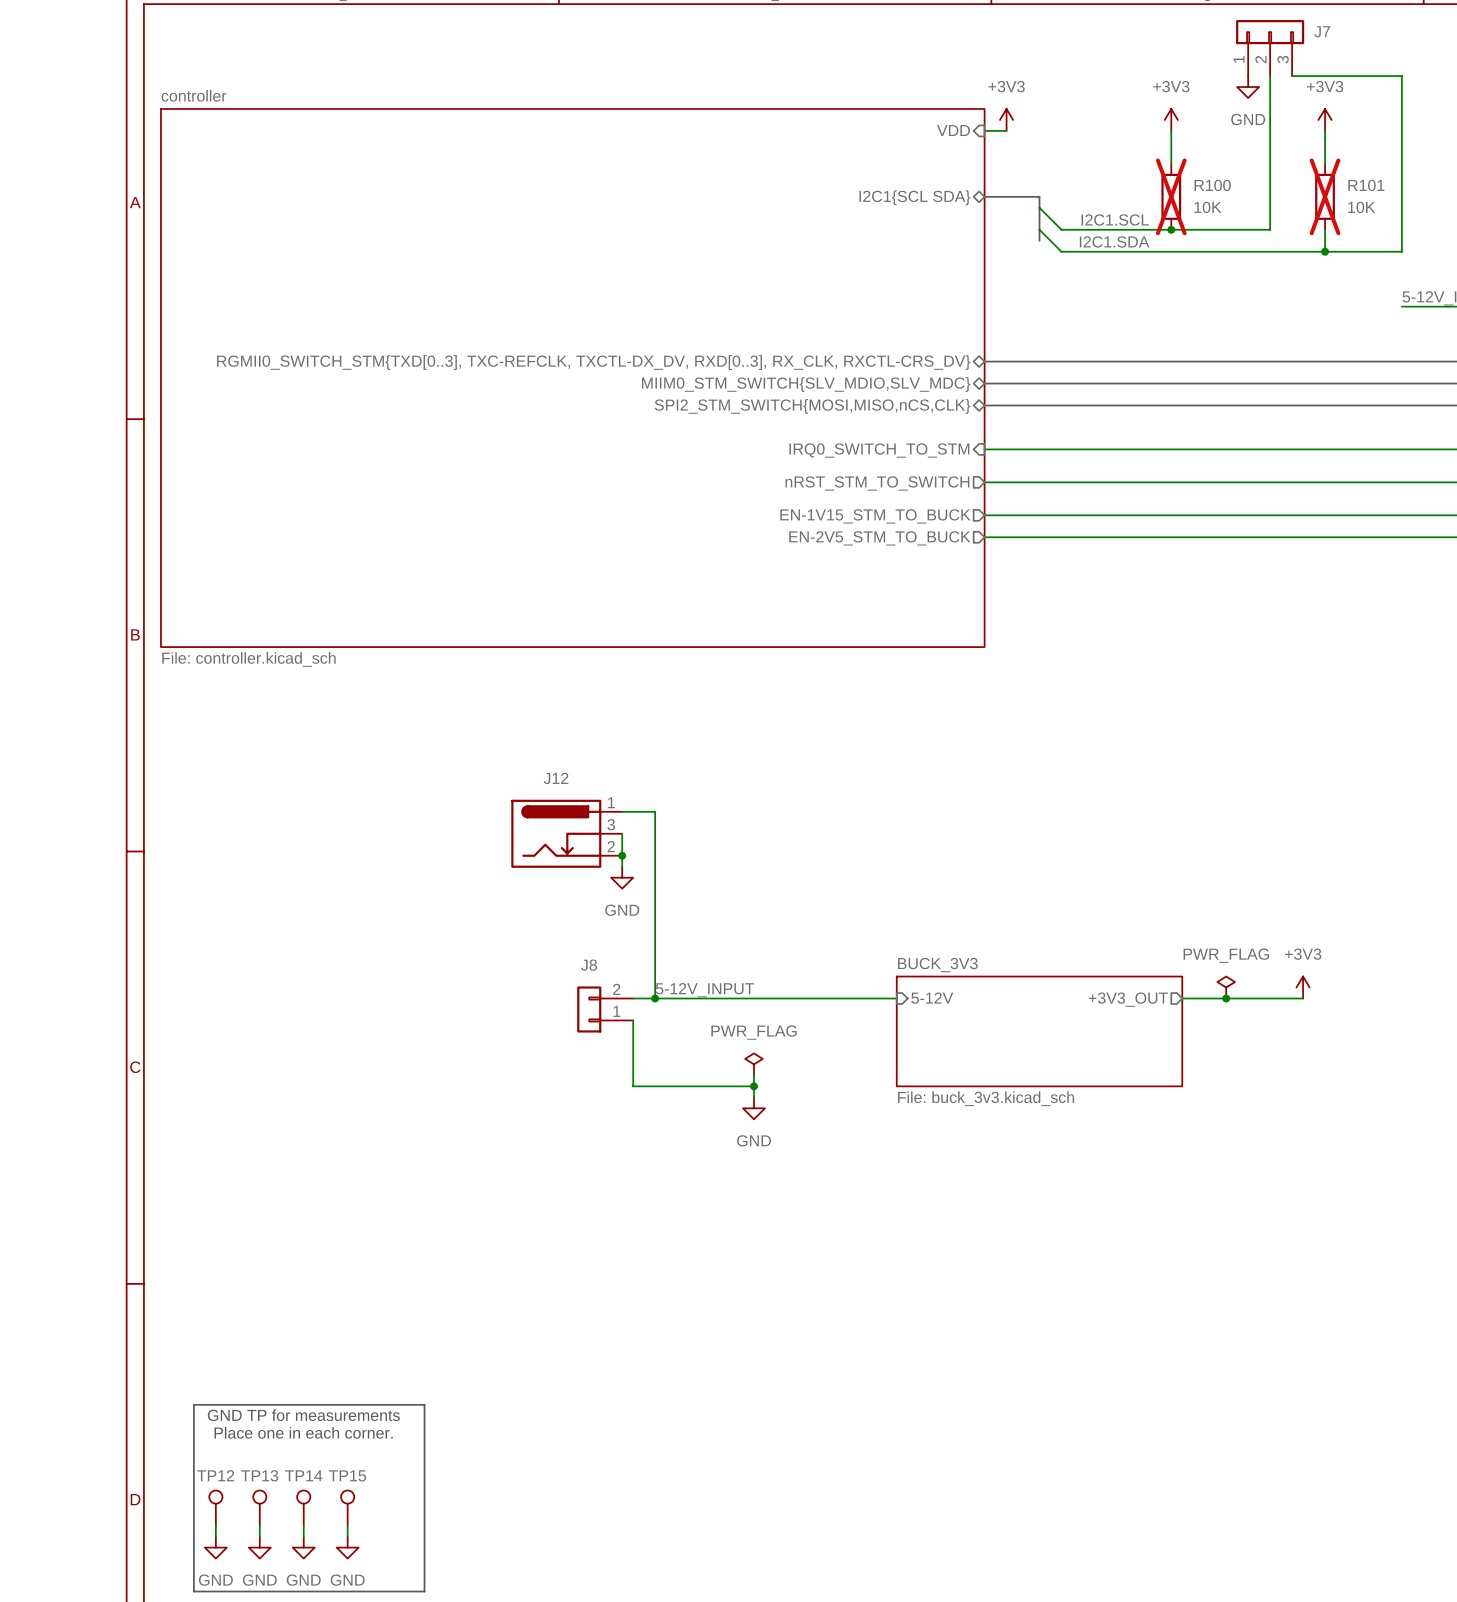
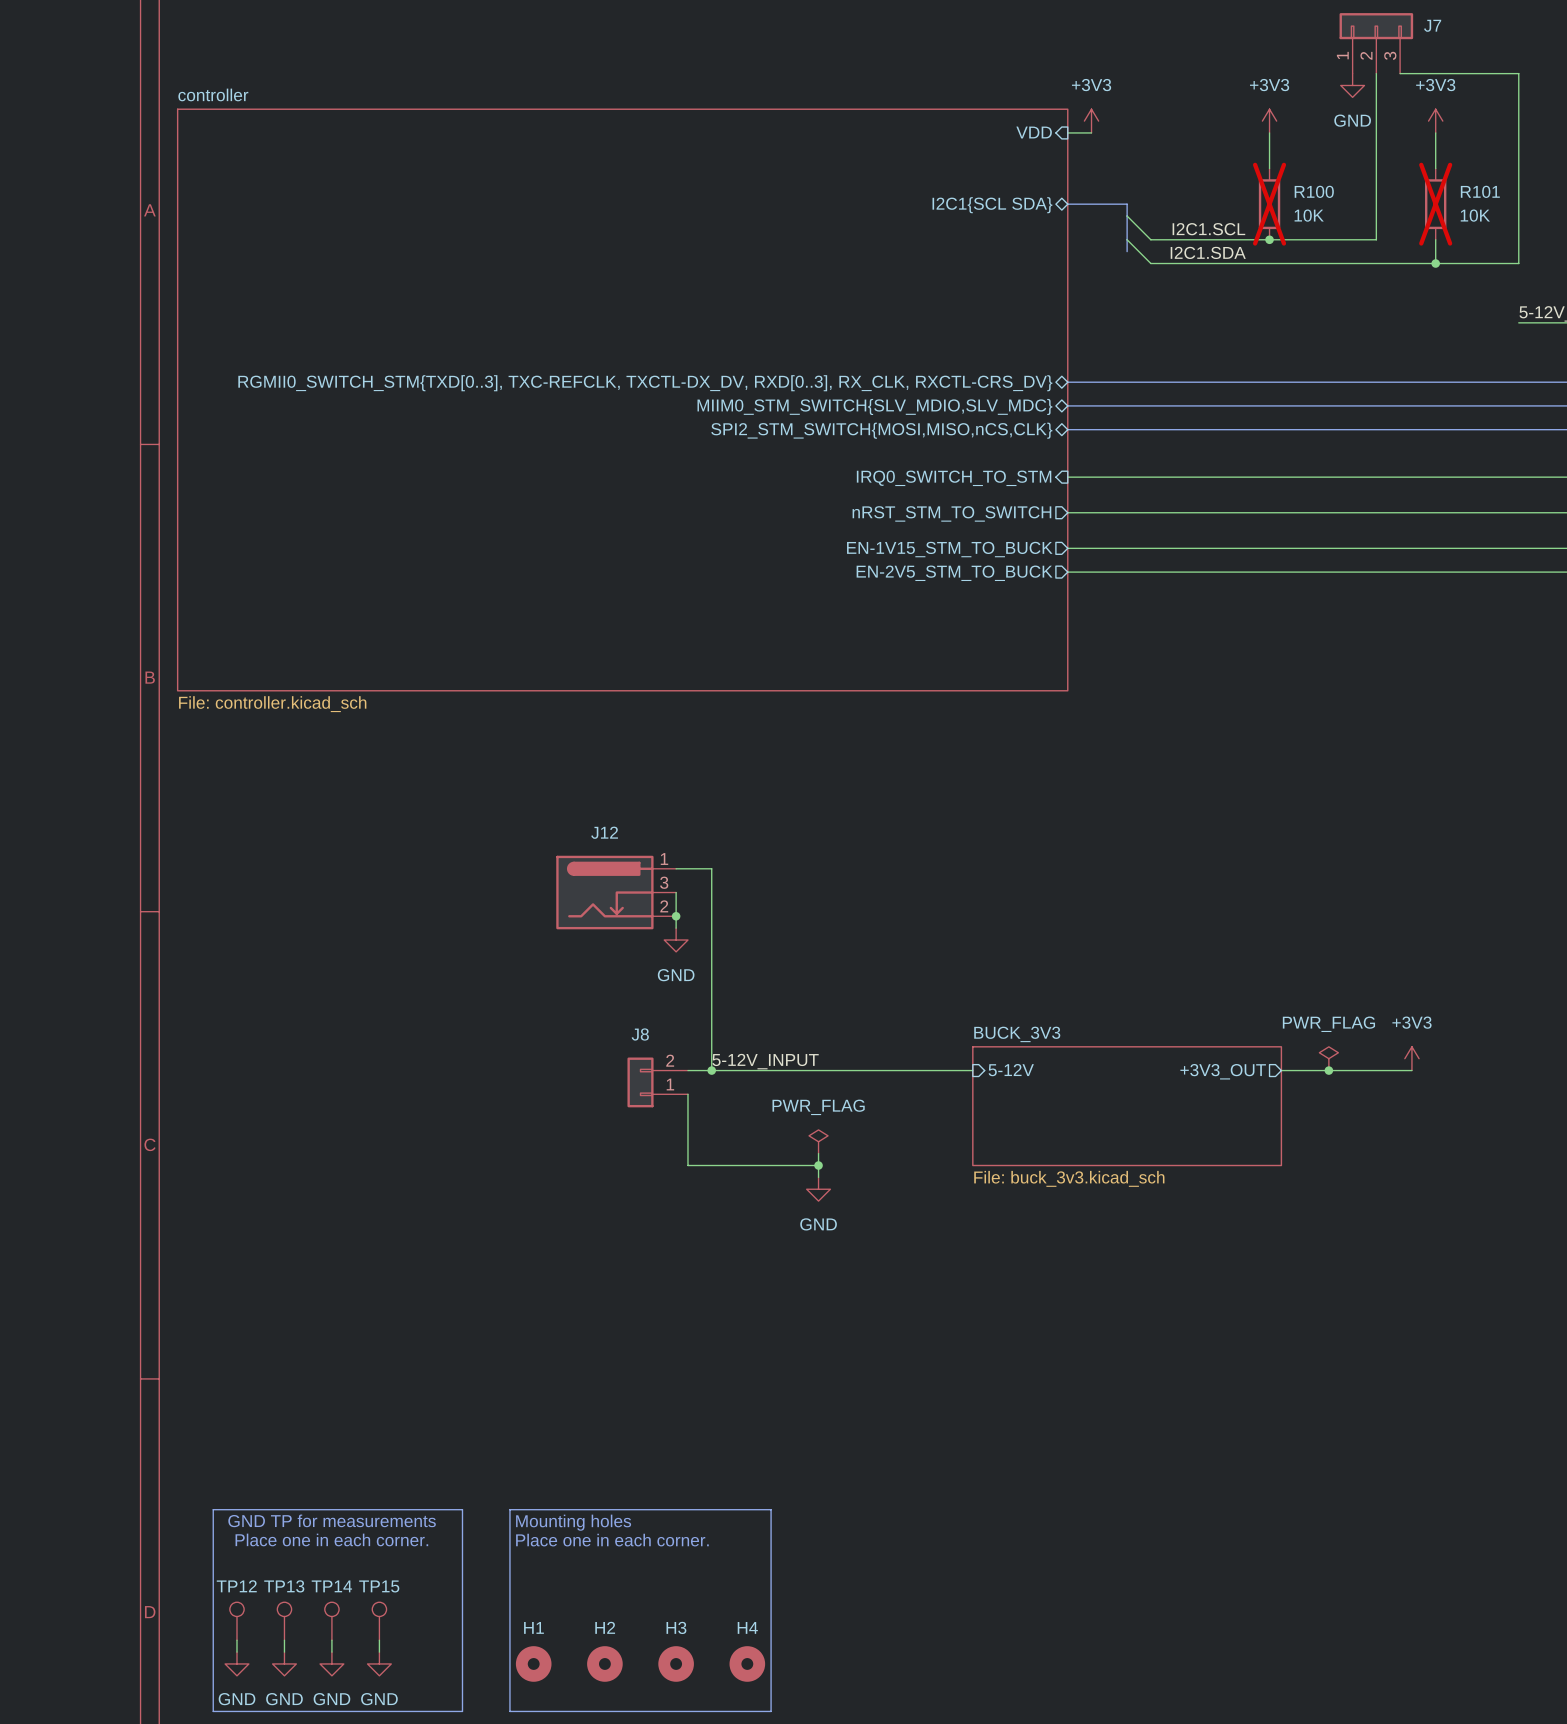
line: none -> (509, 1509) (771, 1509) (771, 1711) (509, 1711) (509, 1509)
text: none -> Mounting holes (573, 1522)
text: none -> Place one in each corner. (612, 1540)
H1: none -> (533, 1663)
H2: none -> (604, 1663)
H3: none -> (676, 1663)
H4: none -> (747, 1663)

